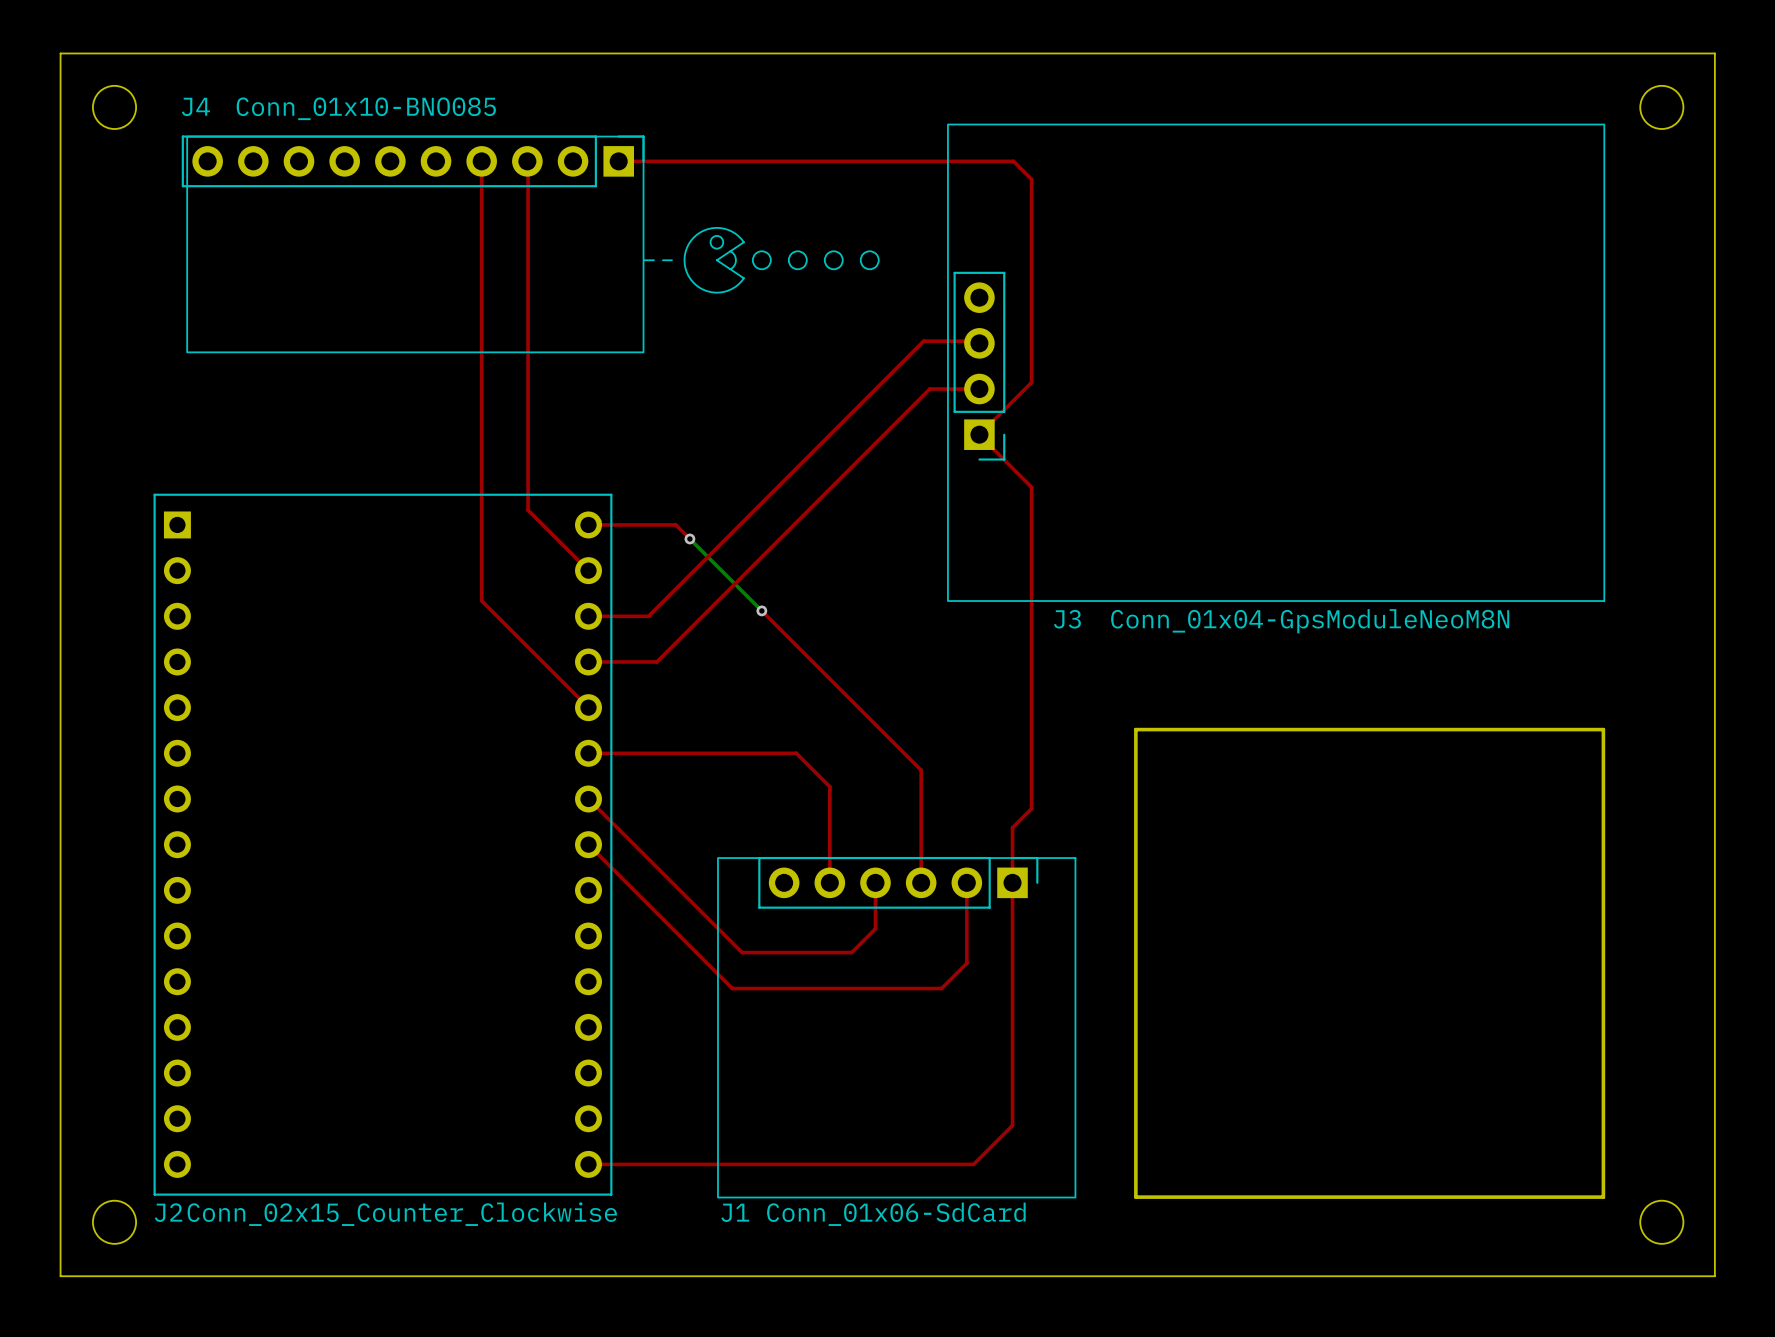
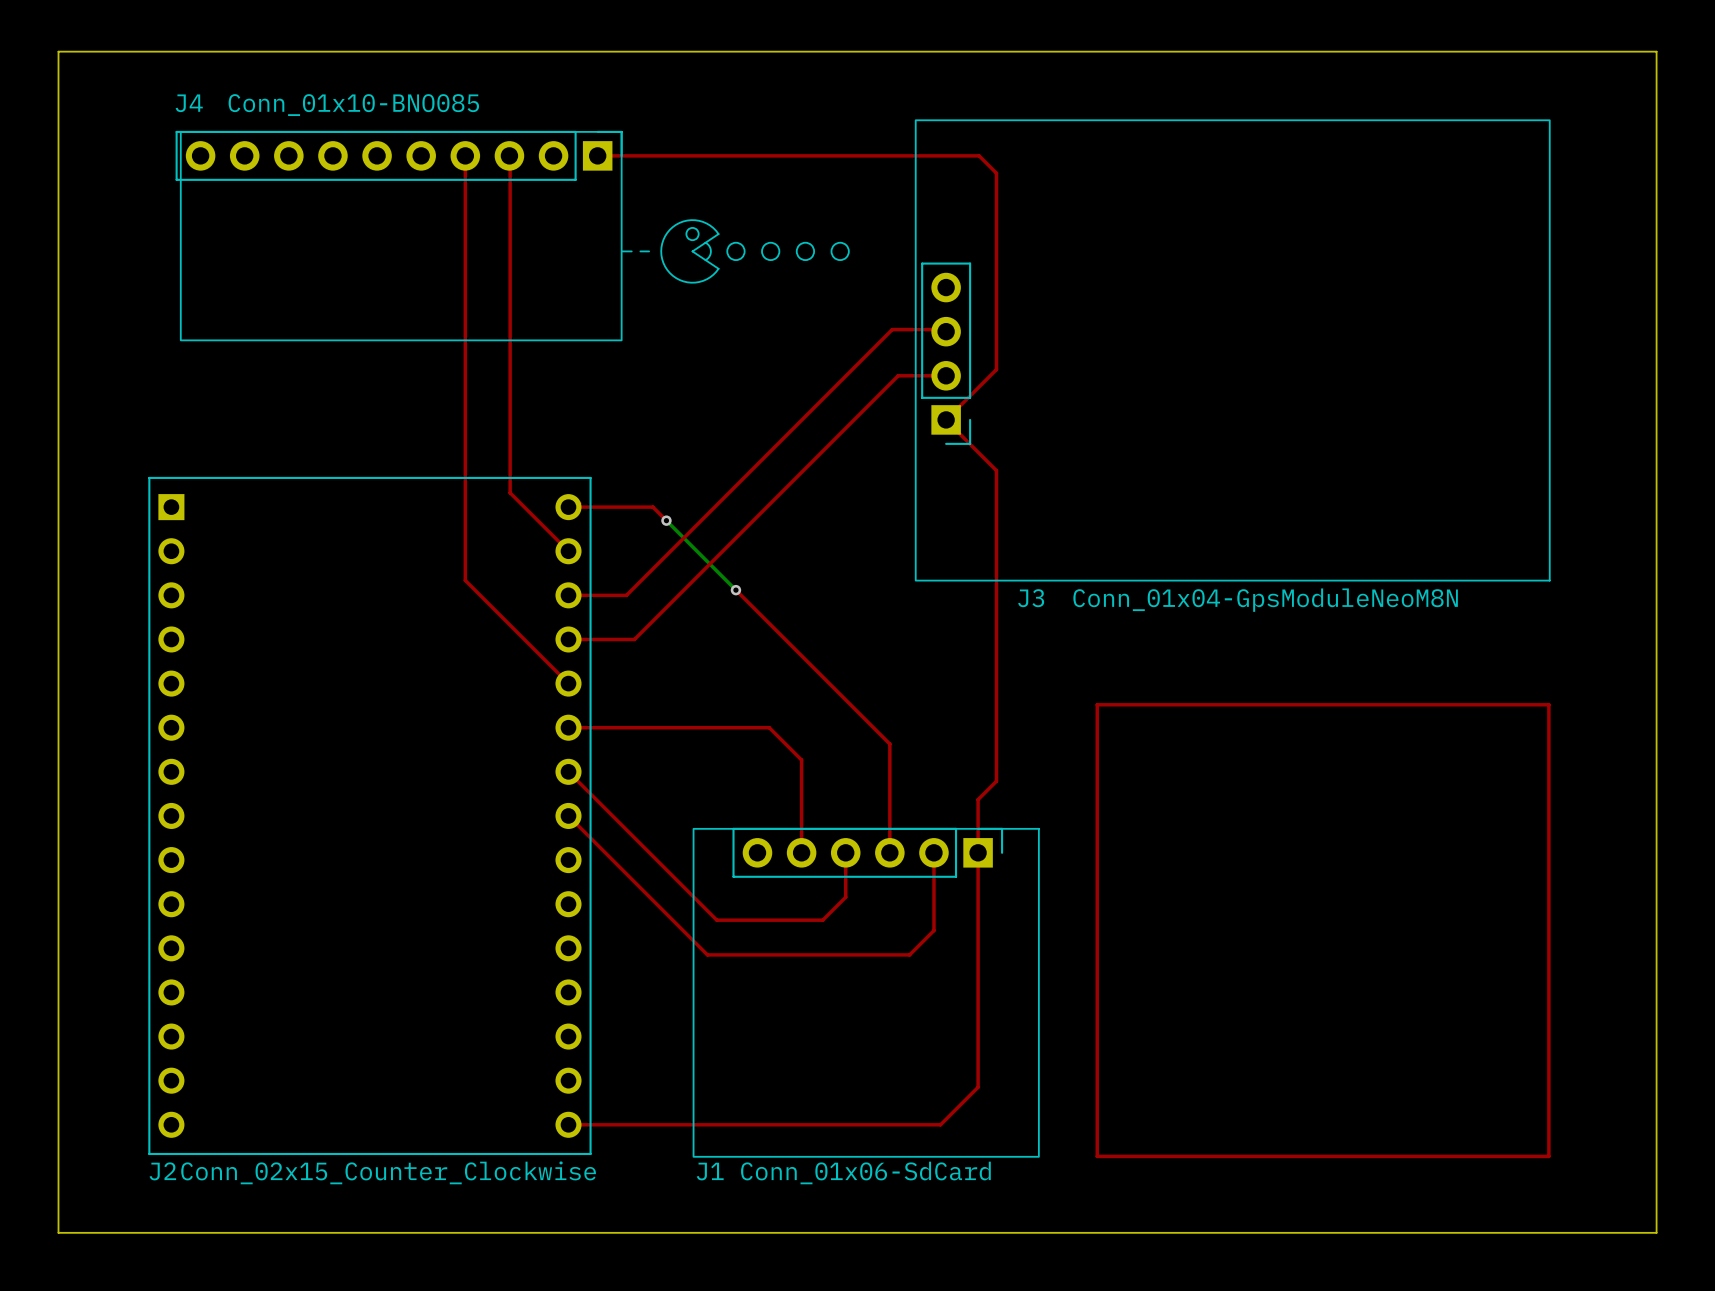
round board edge: [92, 85, 137, 130] -> none
round board edge: [1639, 85, 1684, 130] -> none
board edge: (1135, 729) (1603, 729) (1603, 1197) (1135, 1197) (1135, 729) -> none
top track: none -> (1097, 704) (1548, 704) (1548, 1156) (1097, 1156) (1097, 704)
round board edge: [92, 1200, 137, 1245] -> none
round board edge: [1639, 1200, 1684, 1245] -> none

